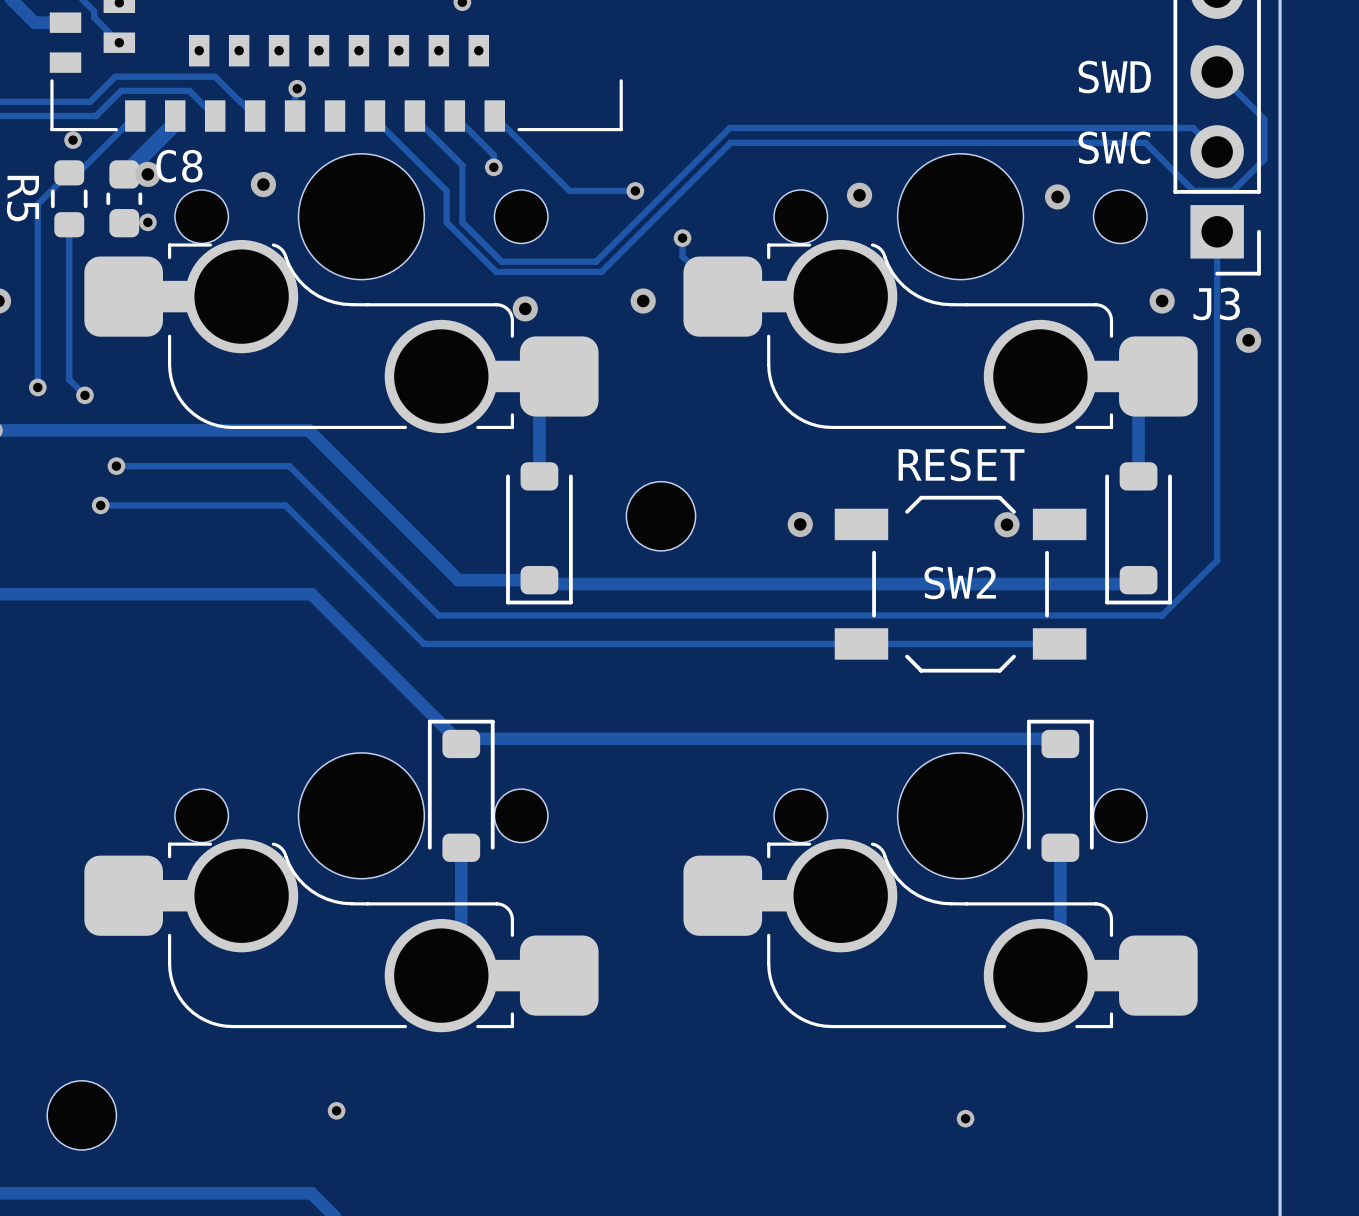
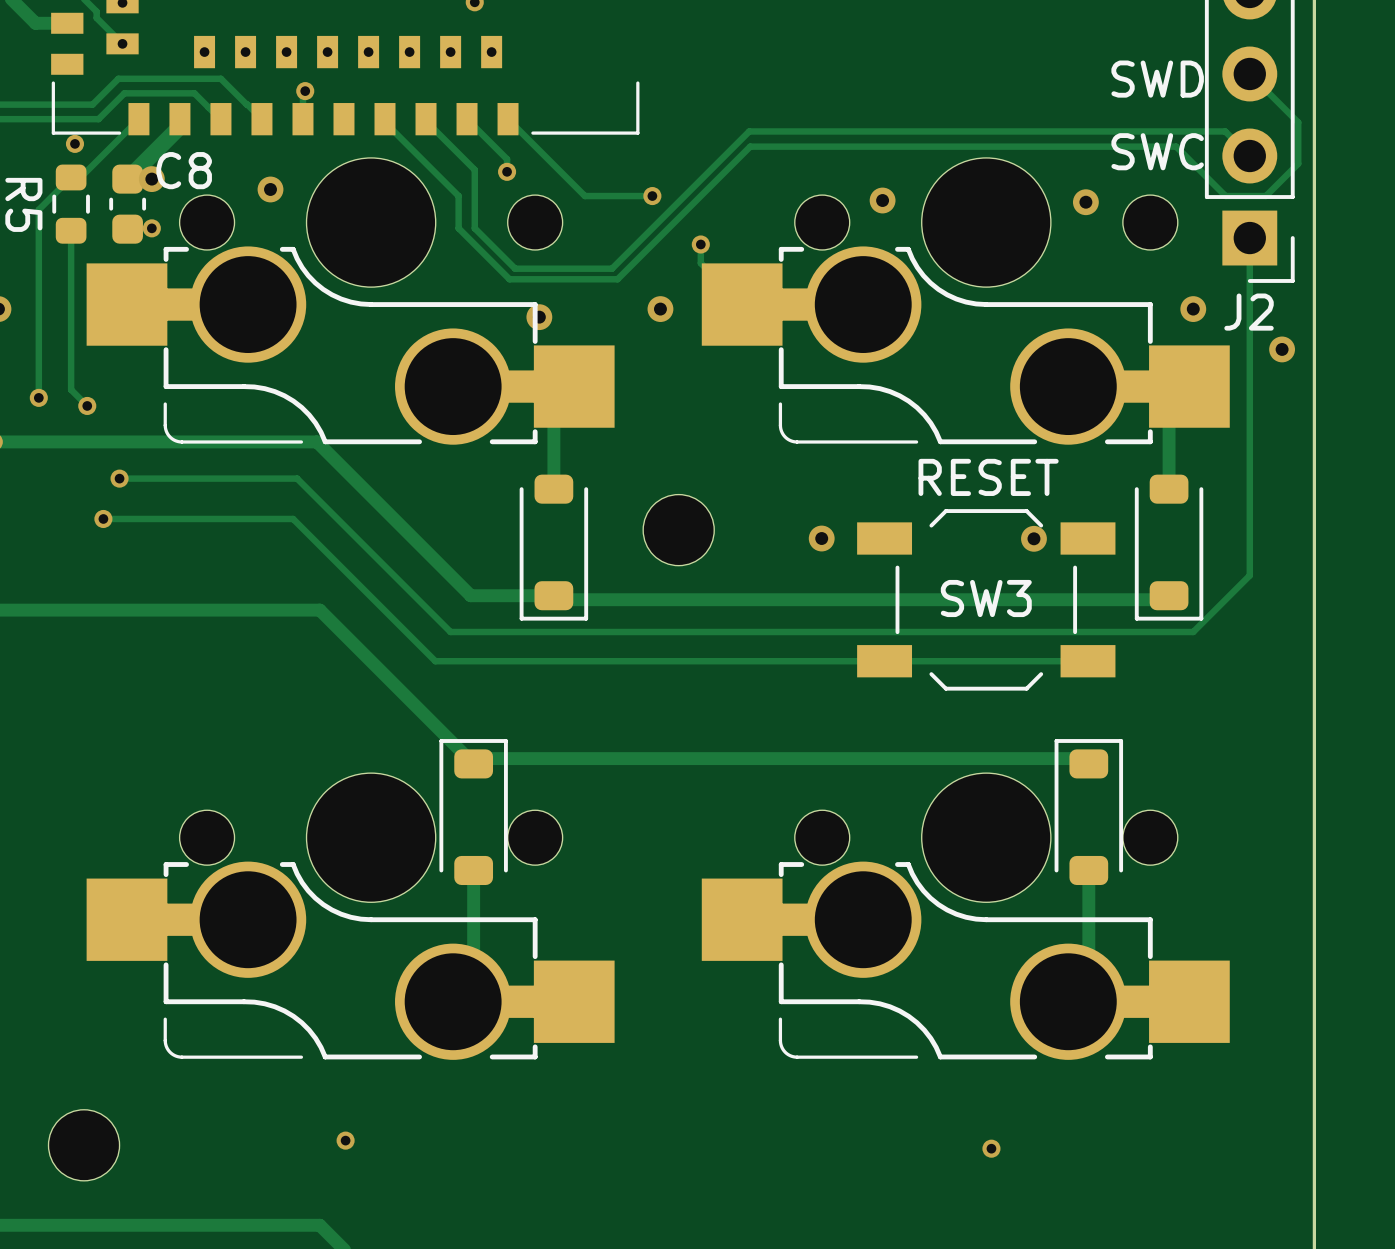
part footprint: [84, 153, 599, 434] -> [86, 157, 615, 445]
part footprint: [683, 153, 1198, 434] -> [701, 157, 1230, 445]
J3 name: J3 (1216, 303) -> J2 (1249, 312)
SW2 name: SW2 (960, 582) -> SW3 (986, 598)
part footprint: [84, 752, 599, 1033] -> [86, 773, 615, 1060]
part footprint: [683, 752, 1198, 1033] -> [701, 773, 1230, 1060]

